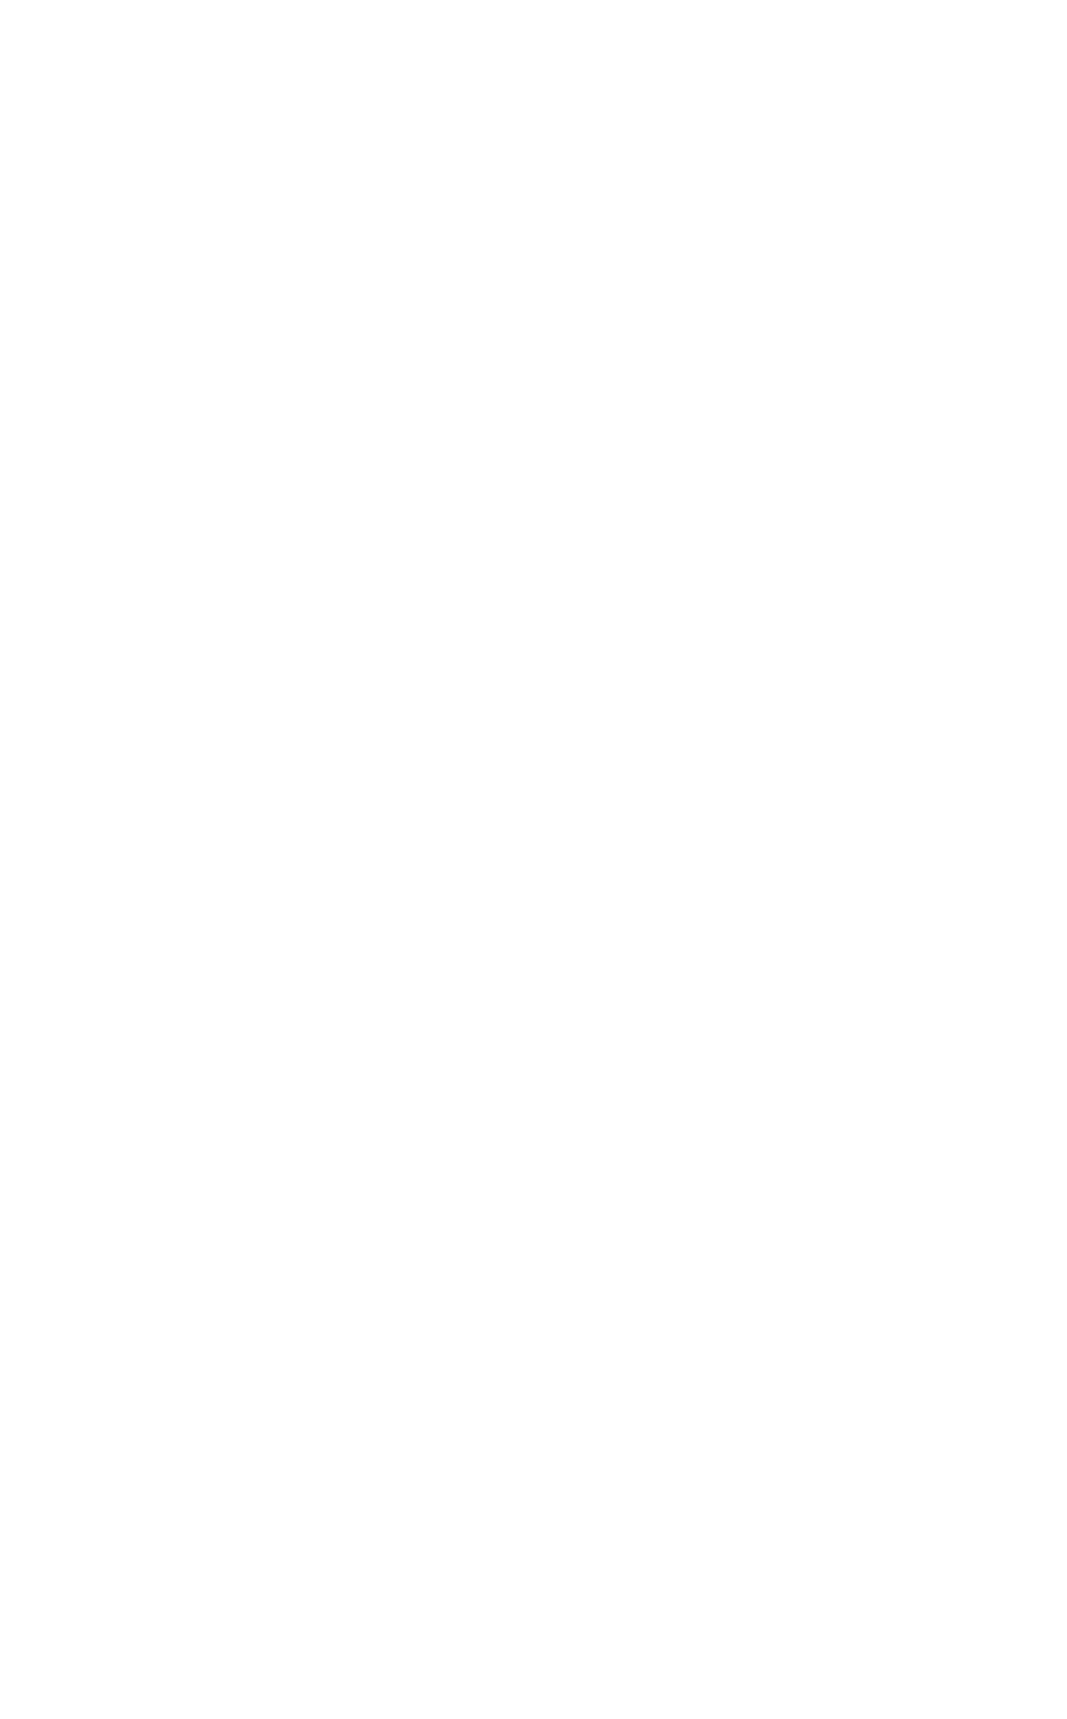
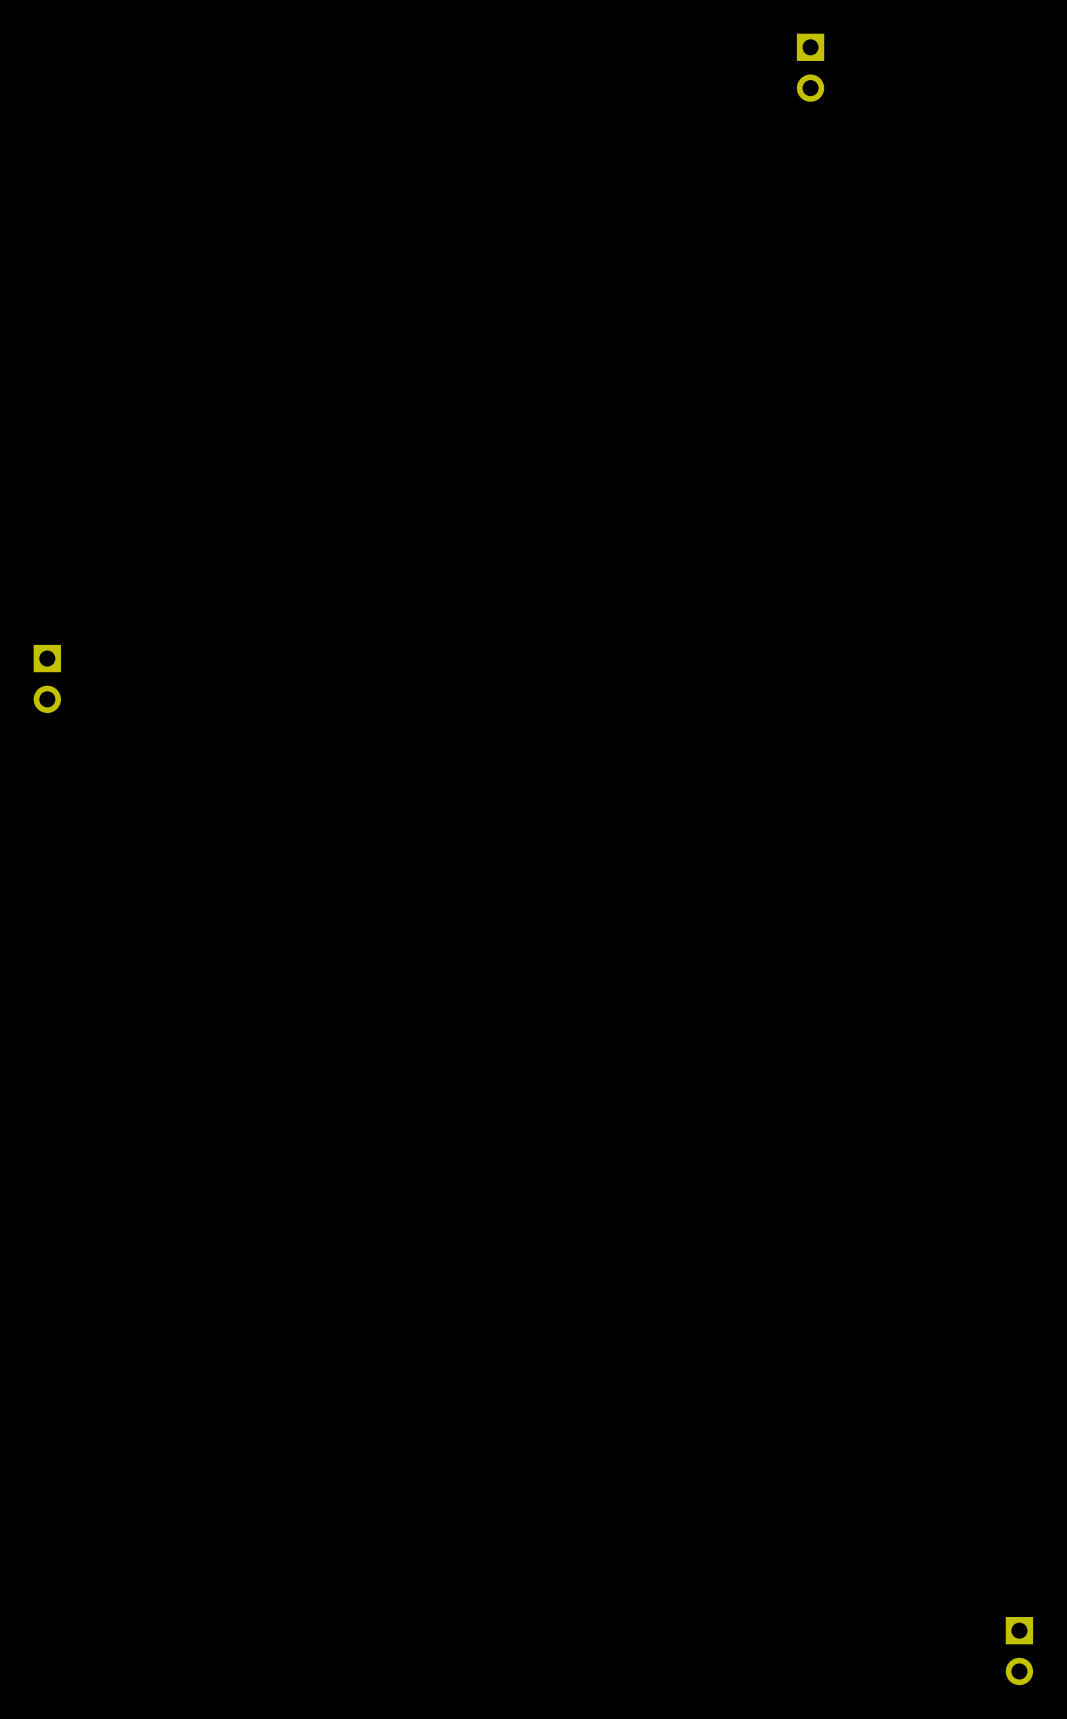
part: none -> (810, 67)
part: none -> (47, 678)
part: none -> (1019, 1651)

